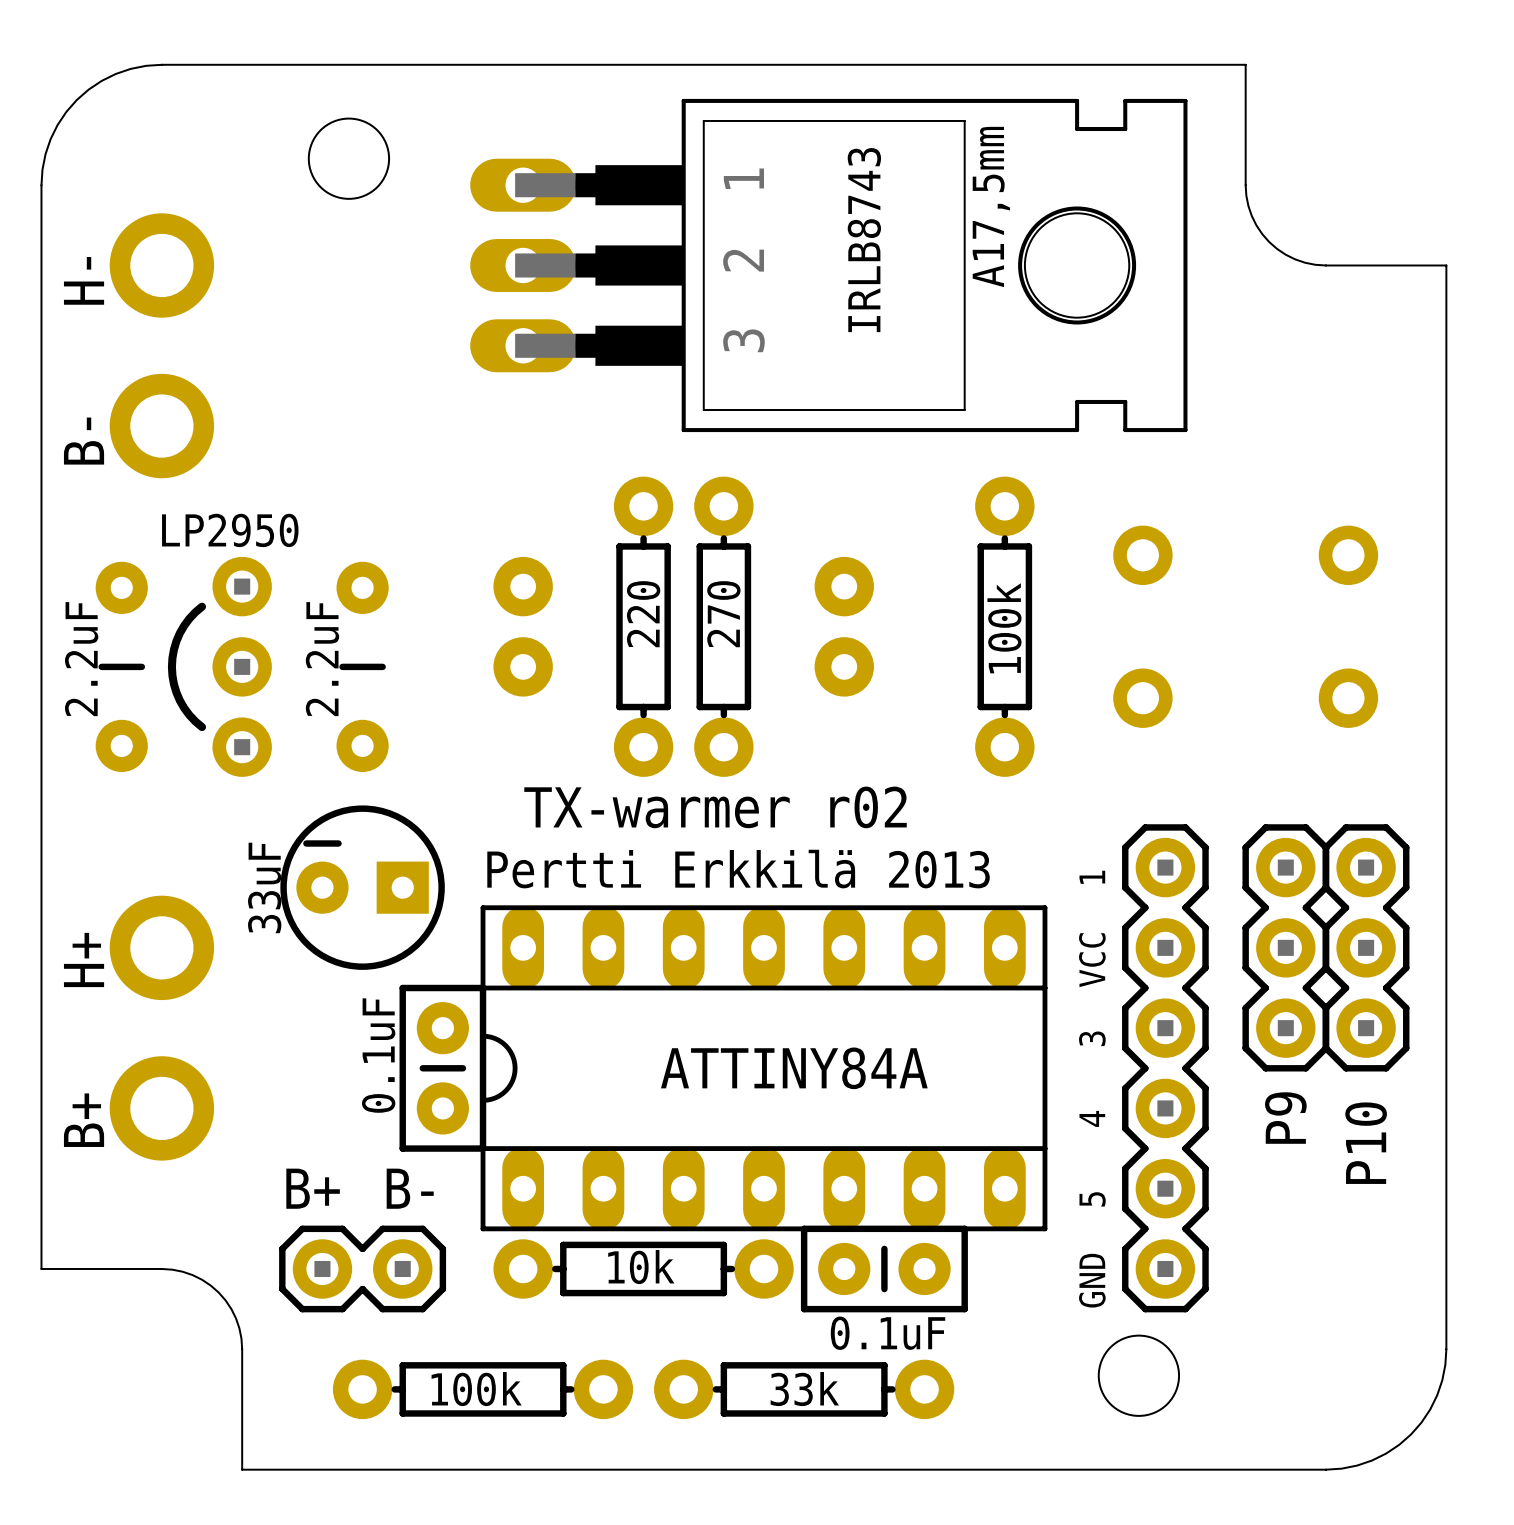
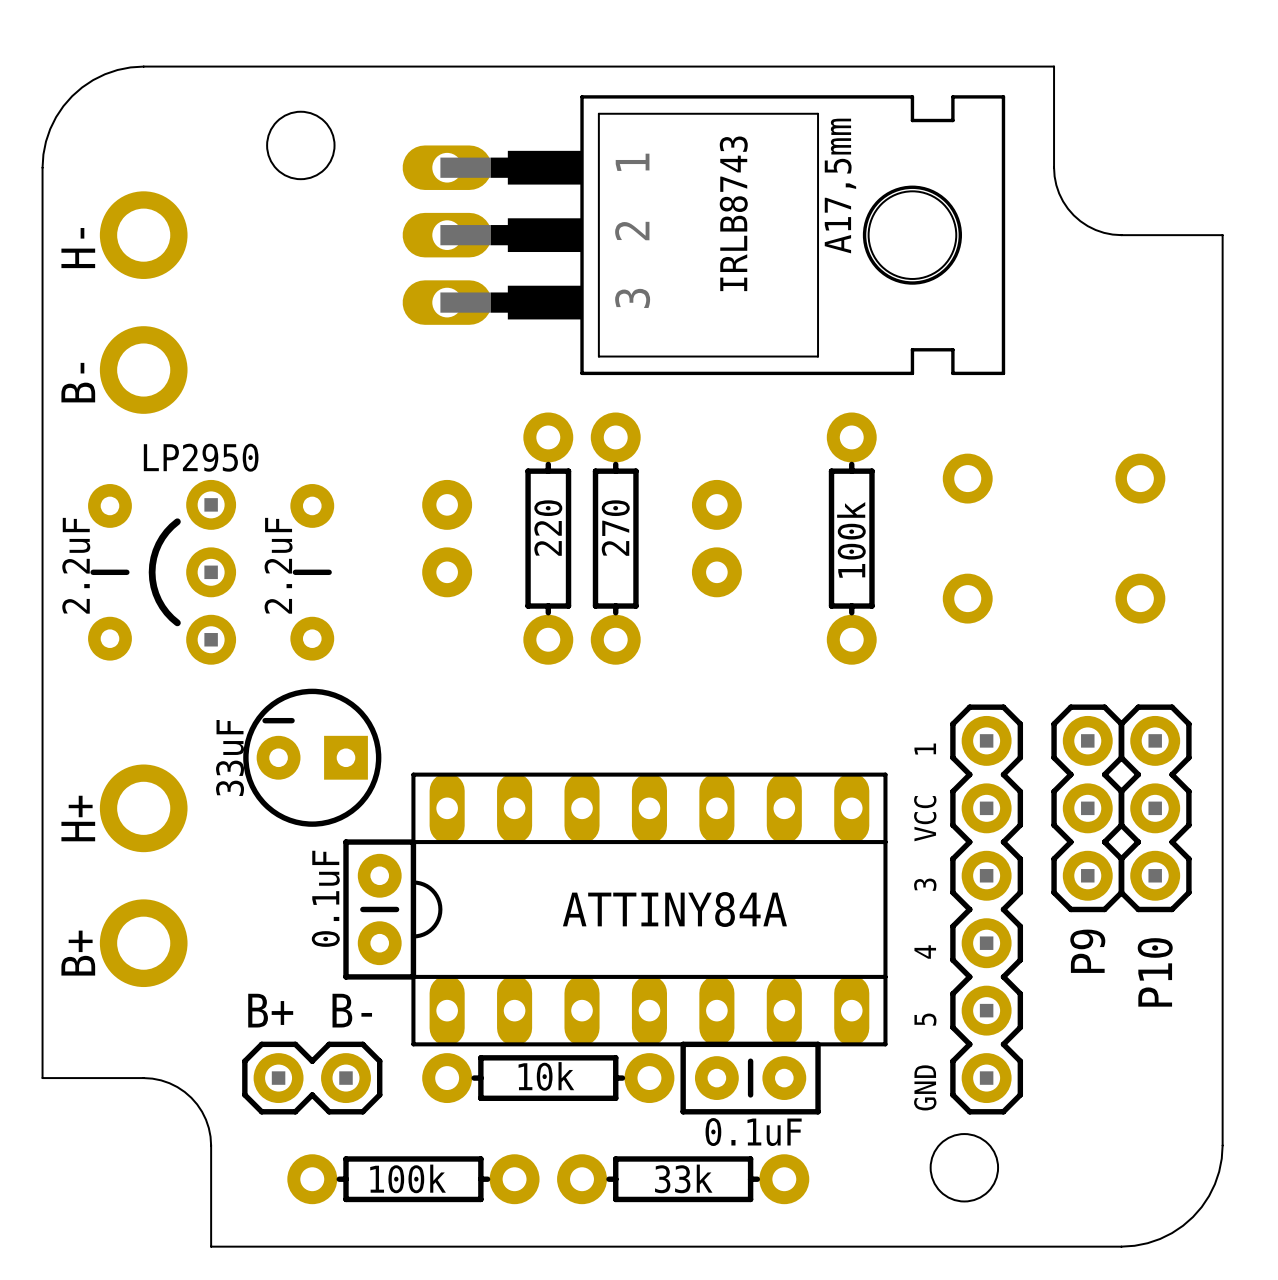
text: TX-warmer r02 (715, 807) -> none
text: Pertti Erkkilä 2013 (738, 869) -> none

